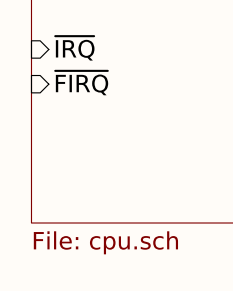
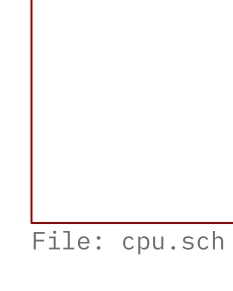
sheet pin: ~{IRQ} (74, 48) -> none
sheet pin: ~{FIRQ} (81, 83) -> none

